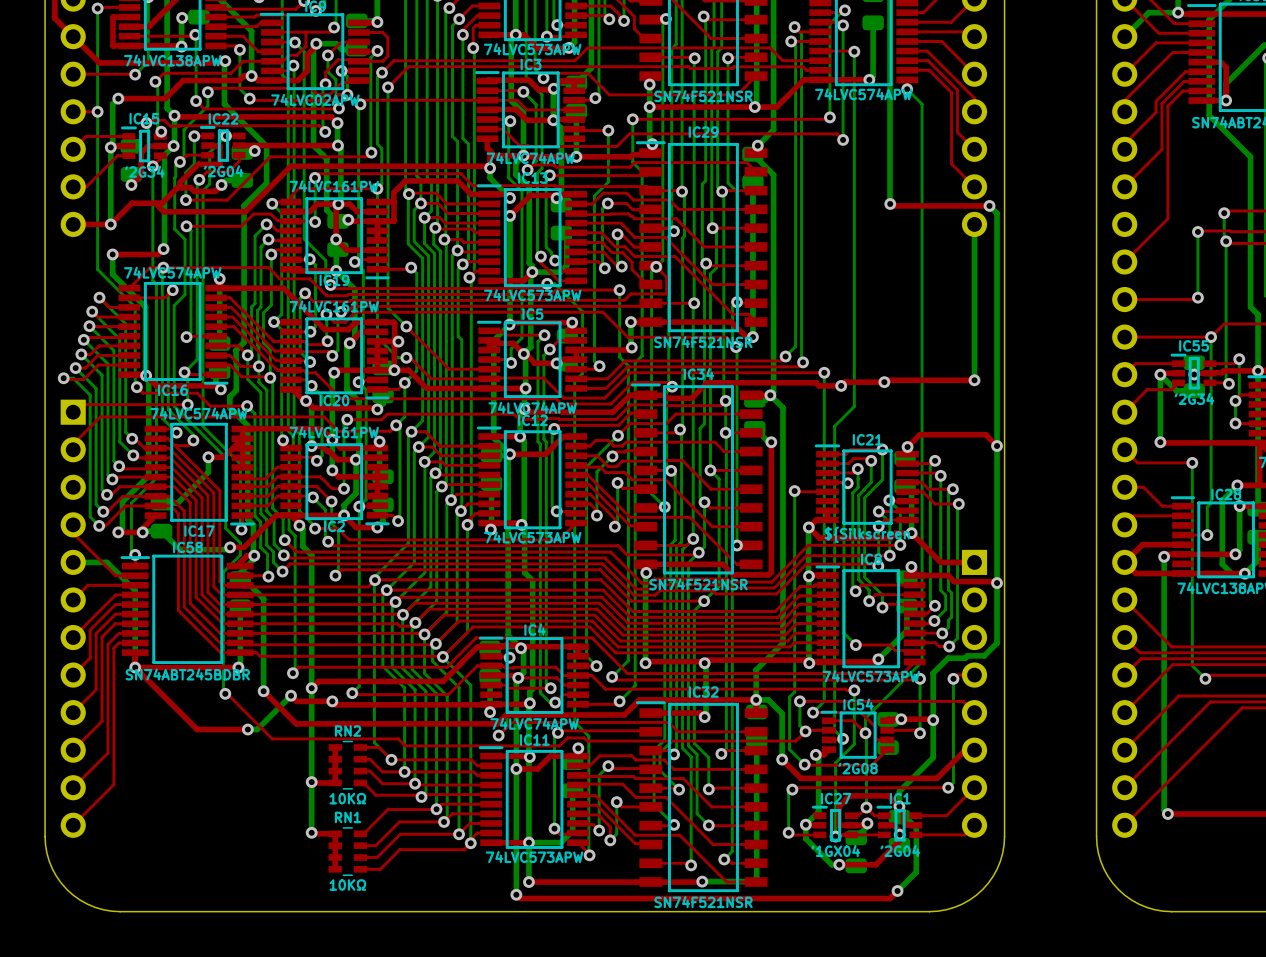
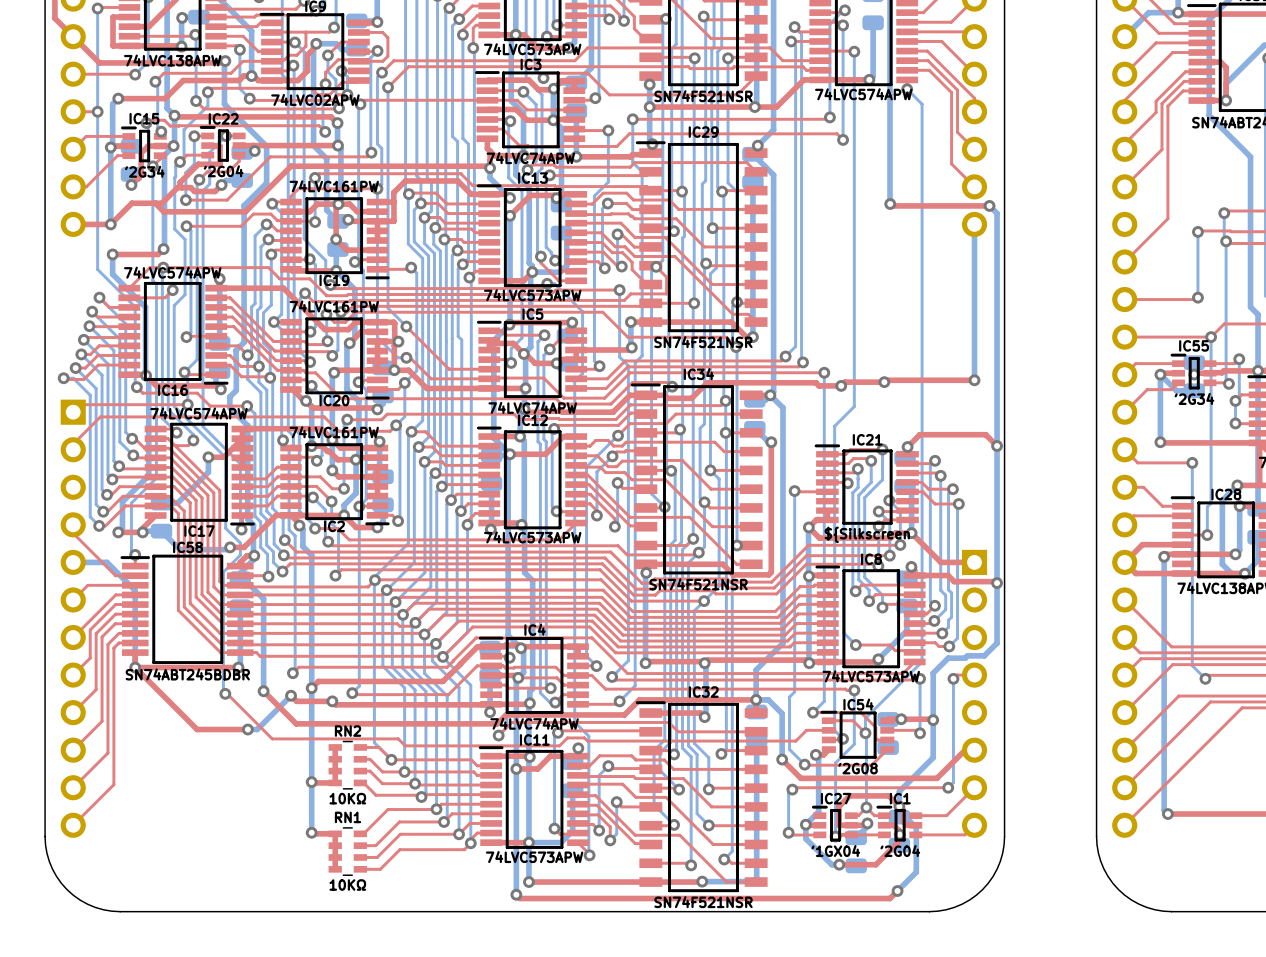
top track: (799, 701) (963, 701) (974, 712) -> none
bottom track: (799, 701) (799, 725) (805, 731) -> none
via: (799, 701) -> none
via: (805, 731) -> none

